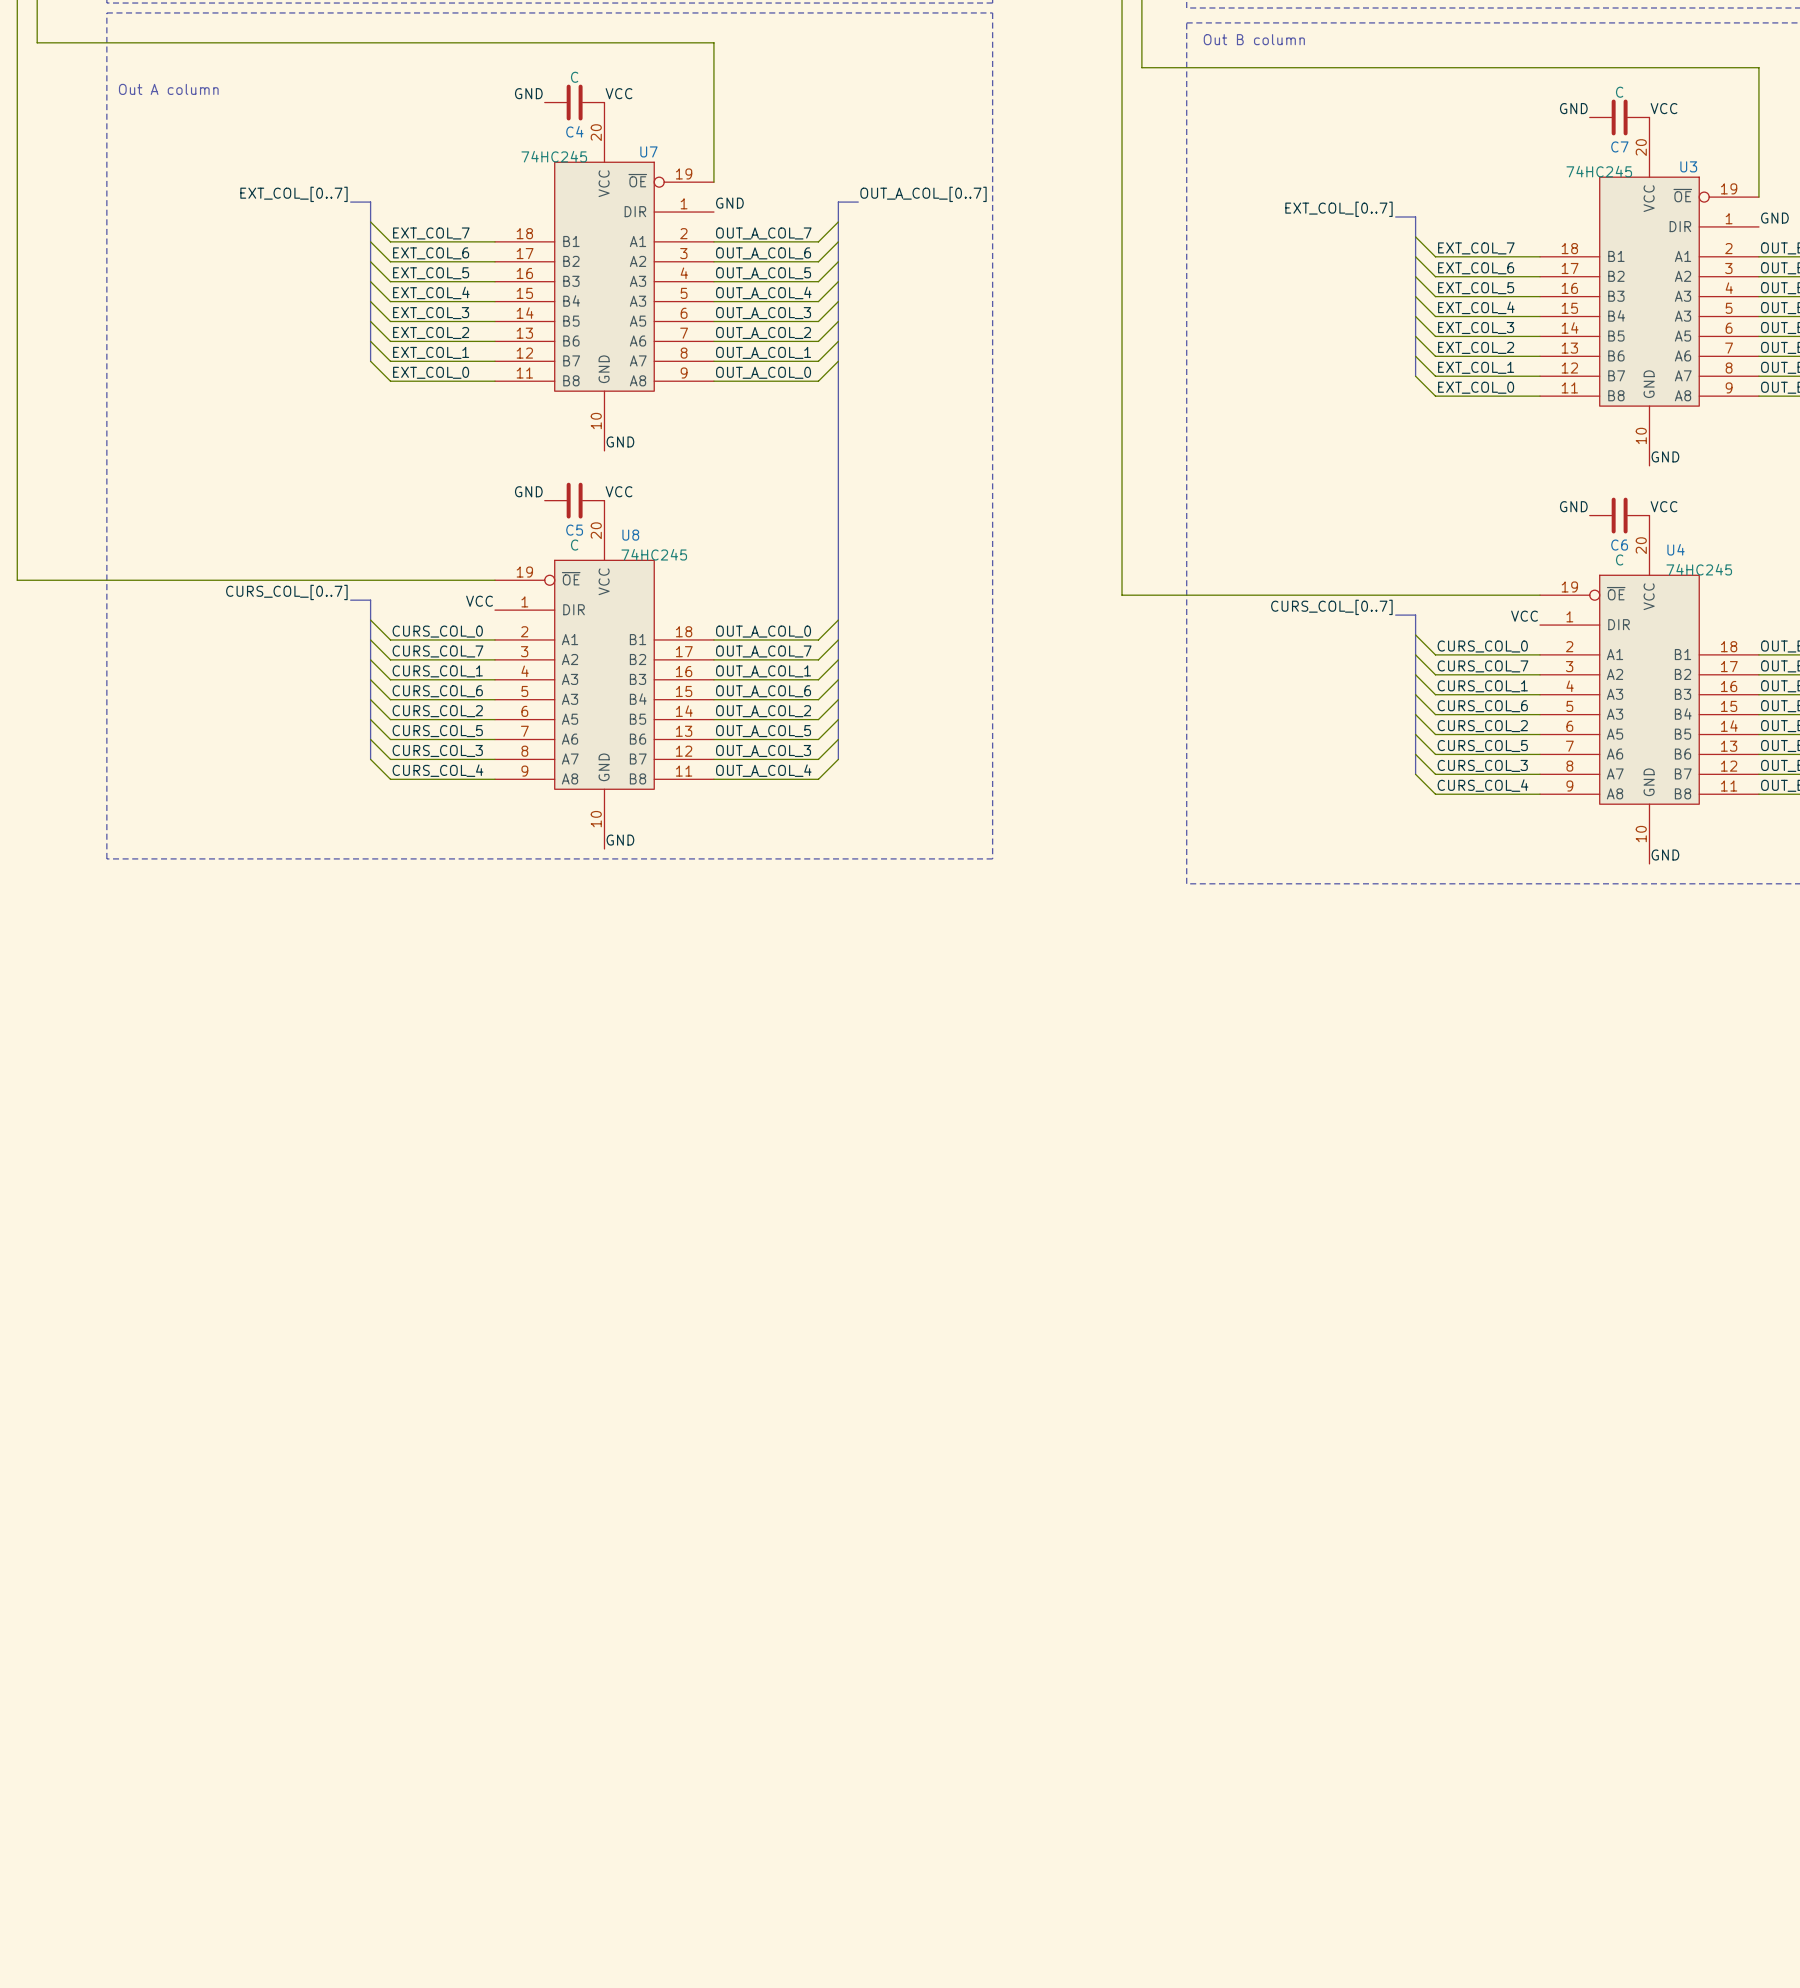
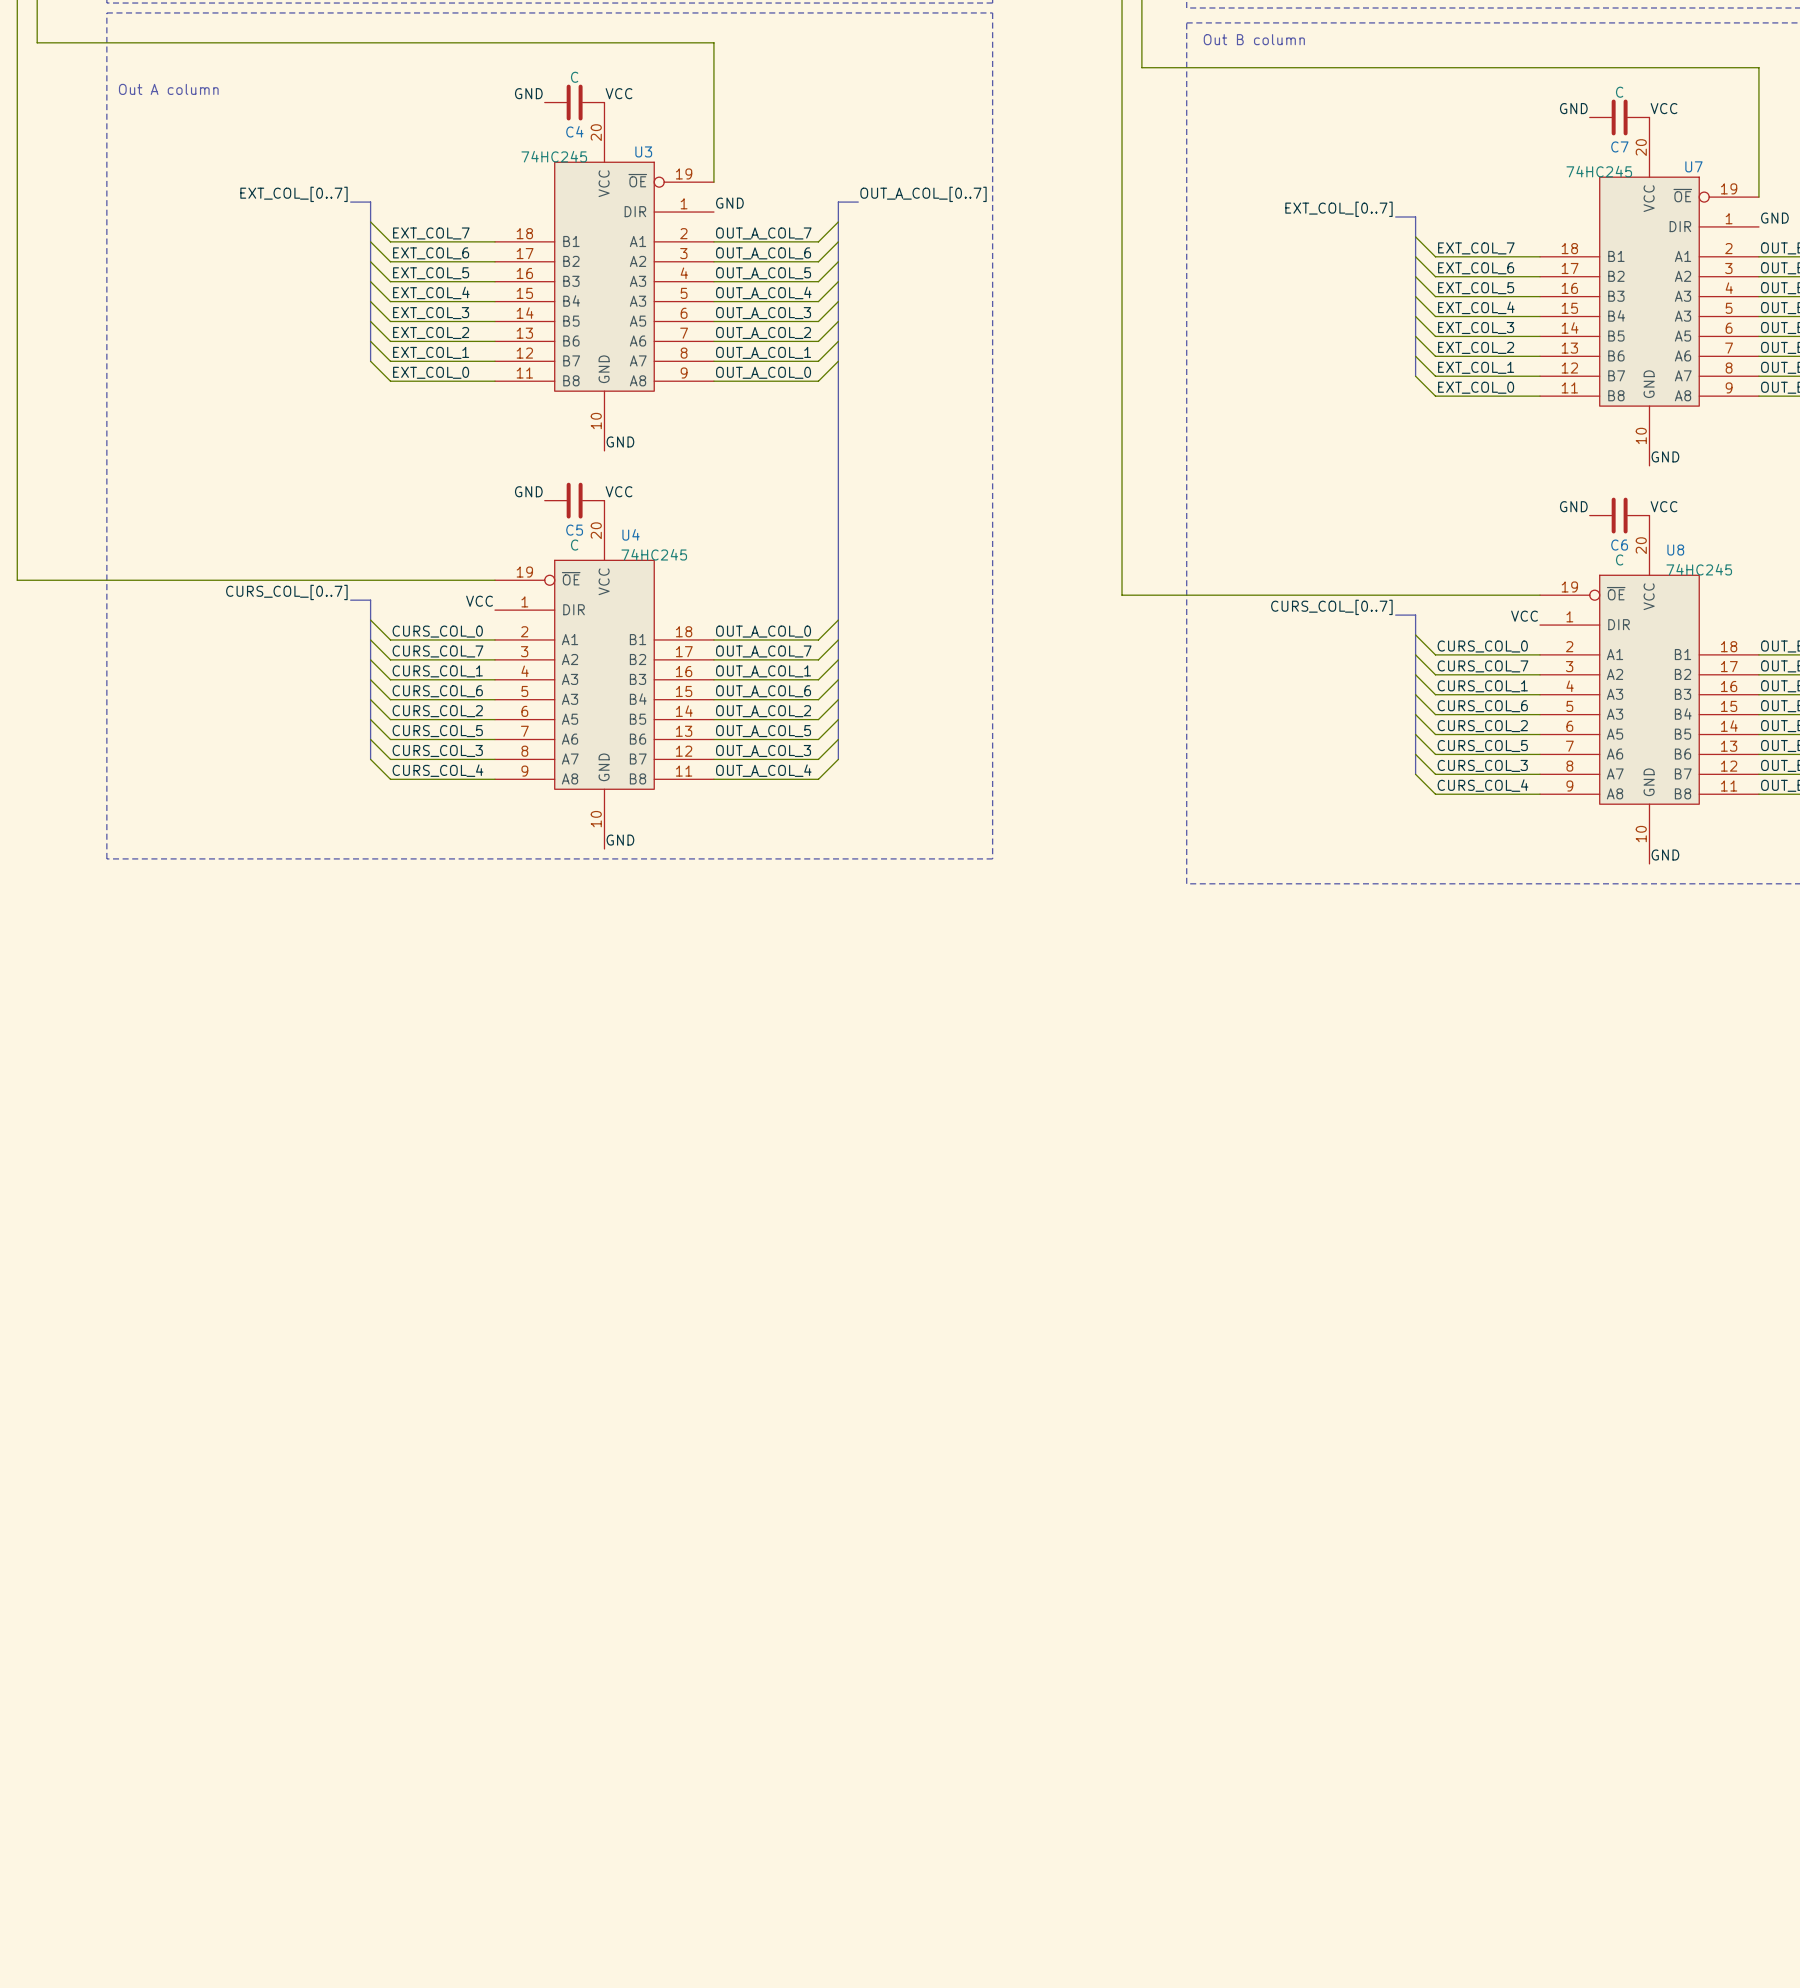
U7 name: U7 (648, 151) -> U3 (643, 151)
U3 name: U3 (1688, 166) -> U7 (1693, 166)
U8 name: U8 (630, 535) -> U4 (631, 534)
U4 name: U4 (1676, 549) -> U8 (1675, 550)

